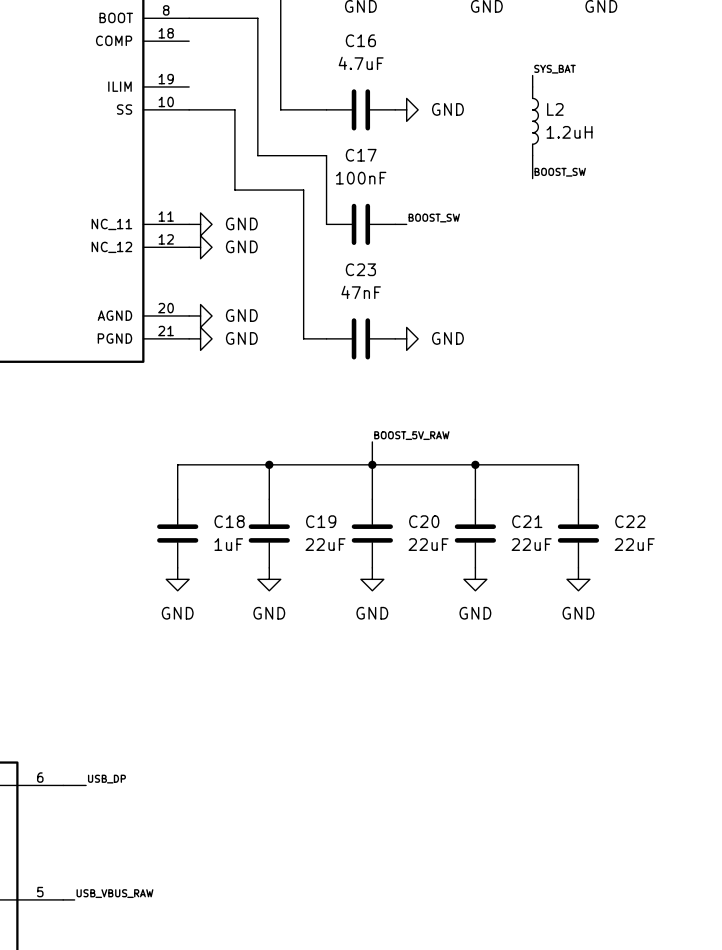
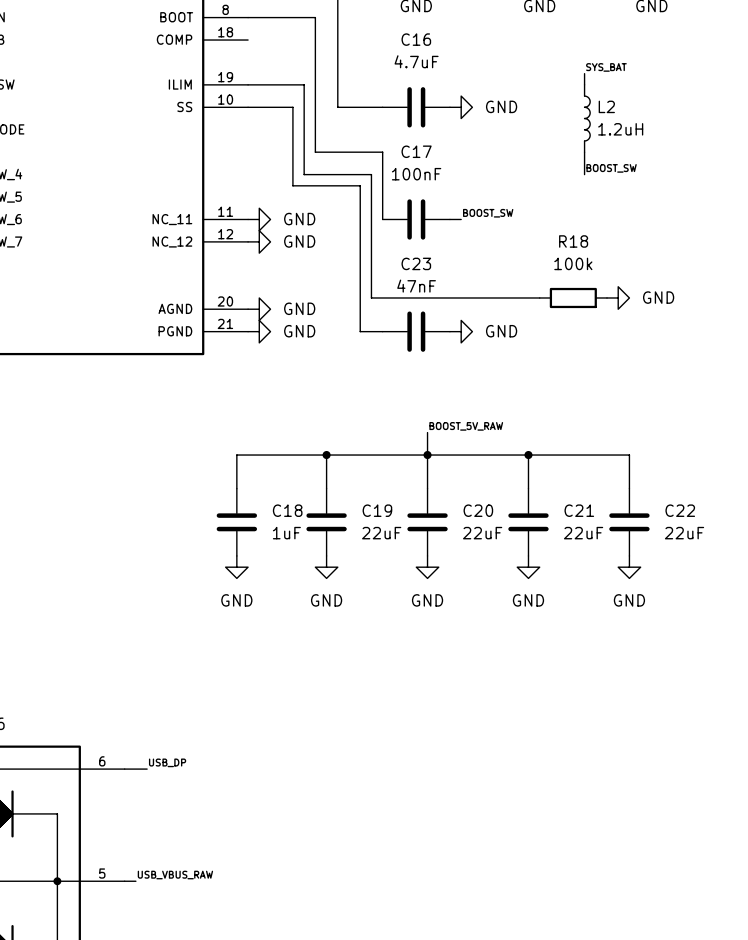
wire: none -> (248, 84) (304, 84) (304, 174) (371, 174) (371, 297) (539, 297)
R18: none -> 100k (573, 297)
power symbol: none -> GND (618, 297)

